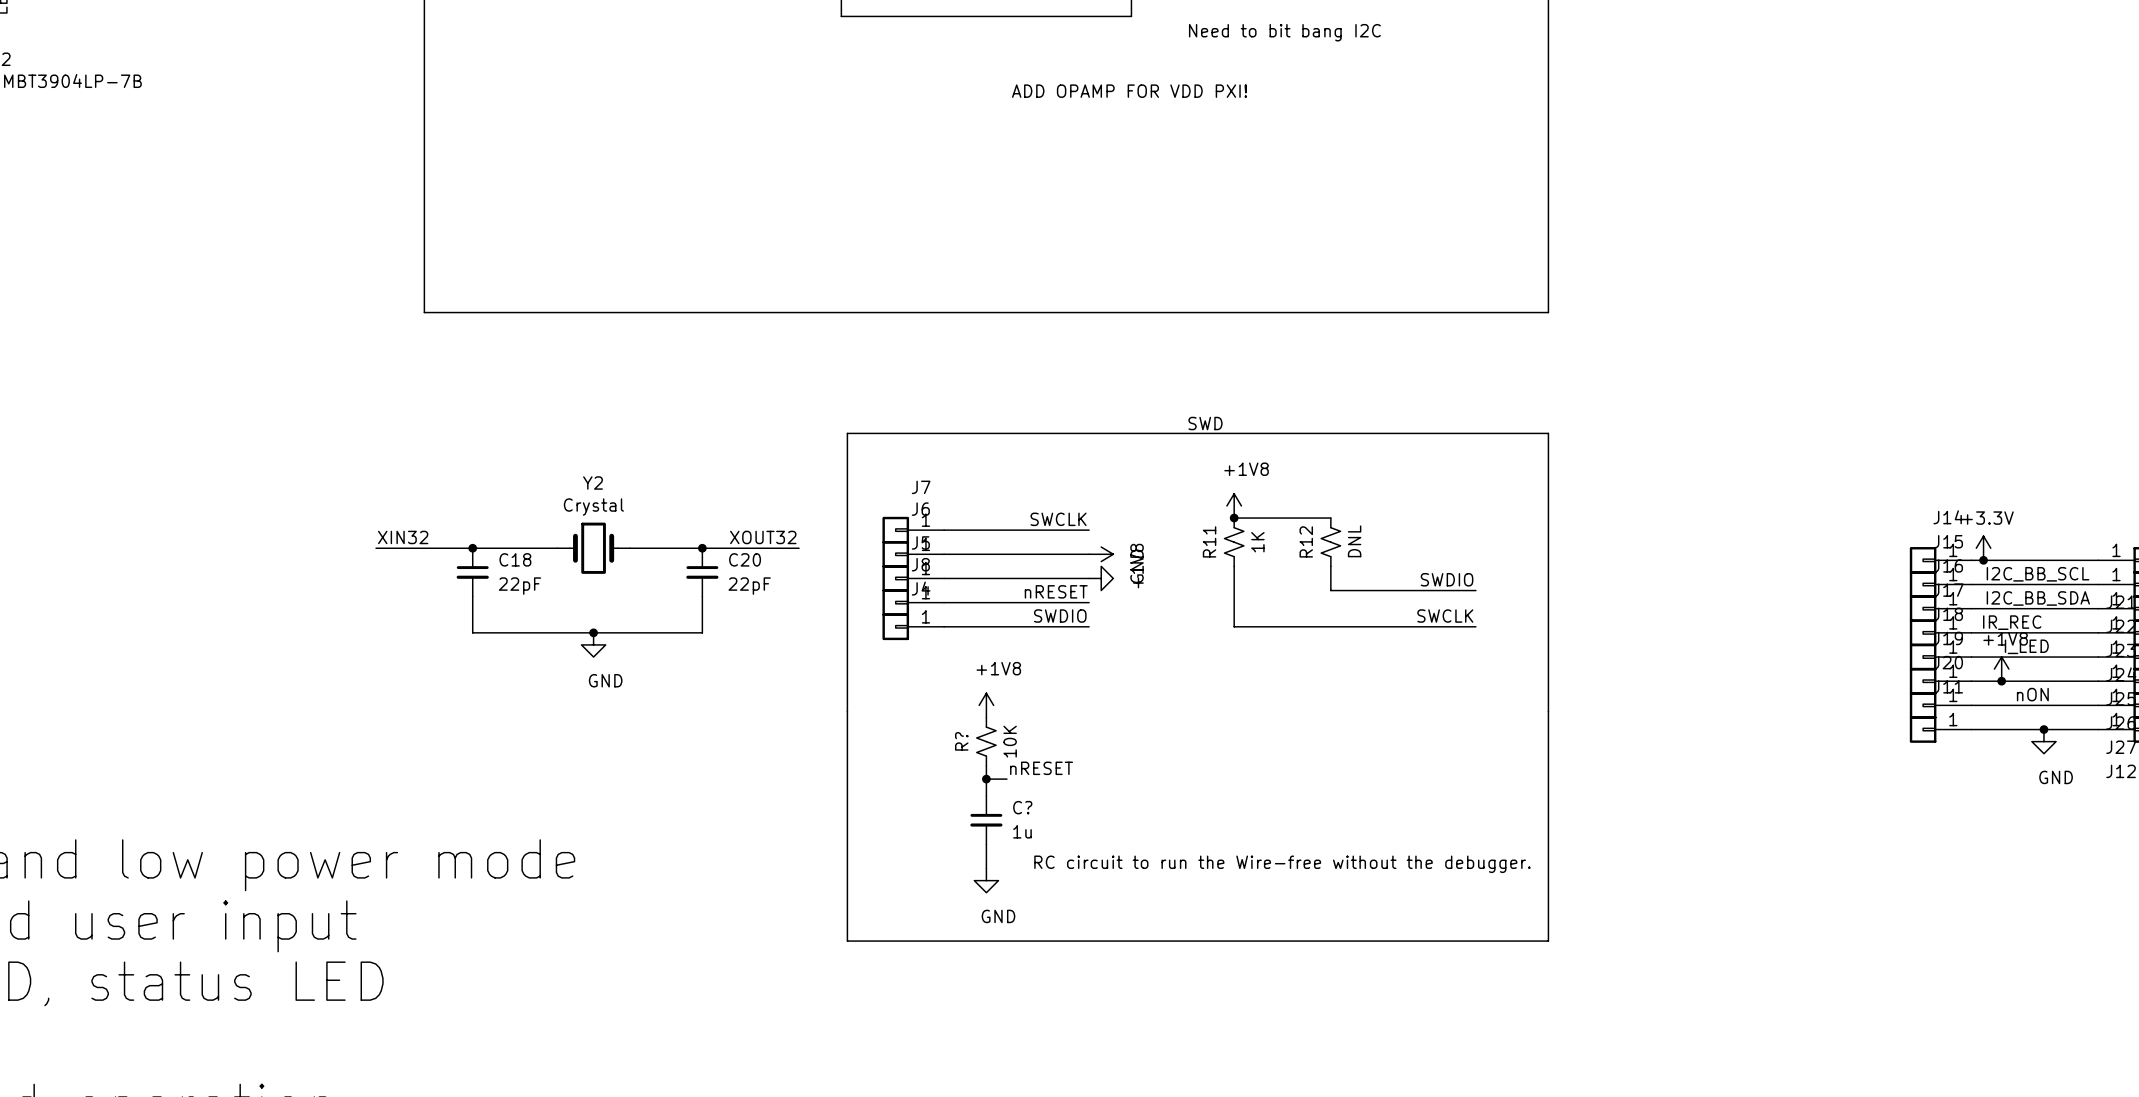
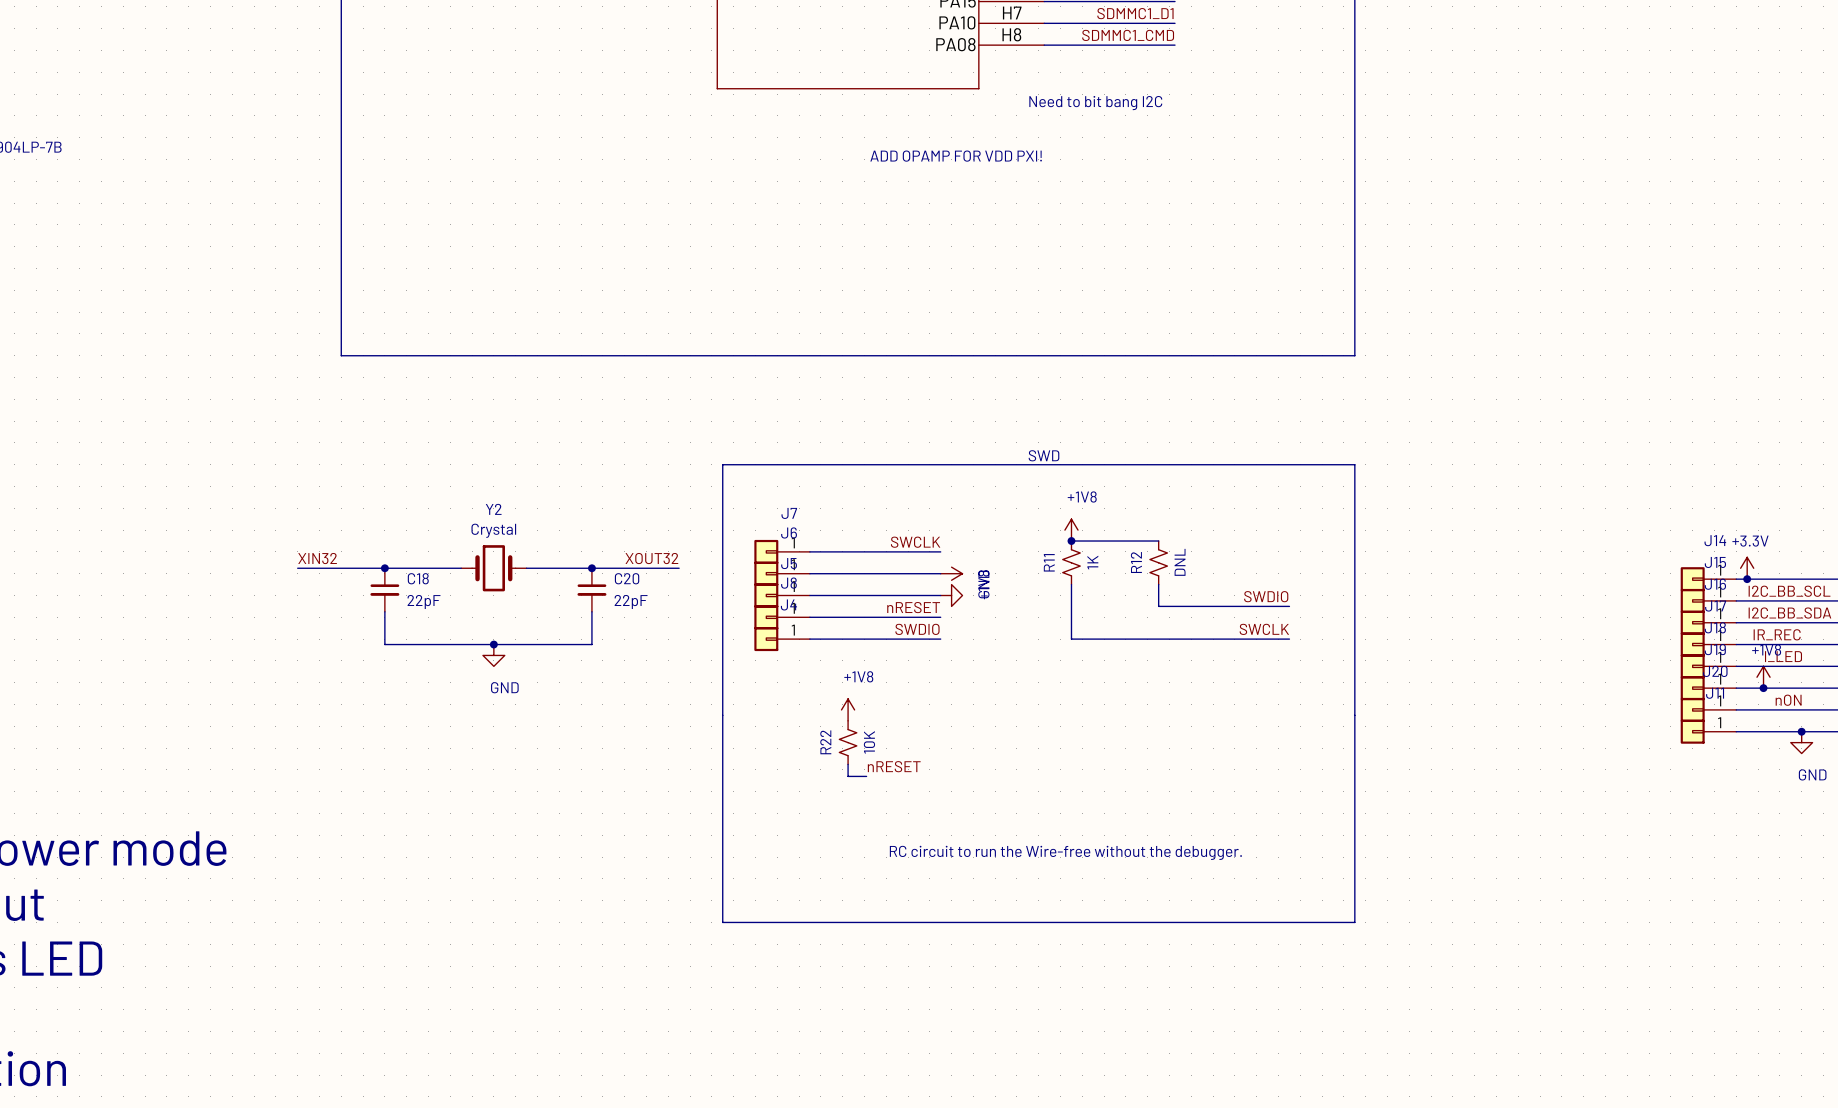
R? name: R? (961, 741) -> R22 (825, 742)
wire: (986, 779) (986, 796) -> none
junction: (986, 779) -> none
C?: 1u (986, 820) -> none
wire: (986, 844) (986, 868) -> none
power symbol: GND (986, 880) -> none

